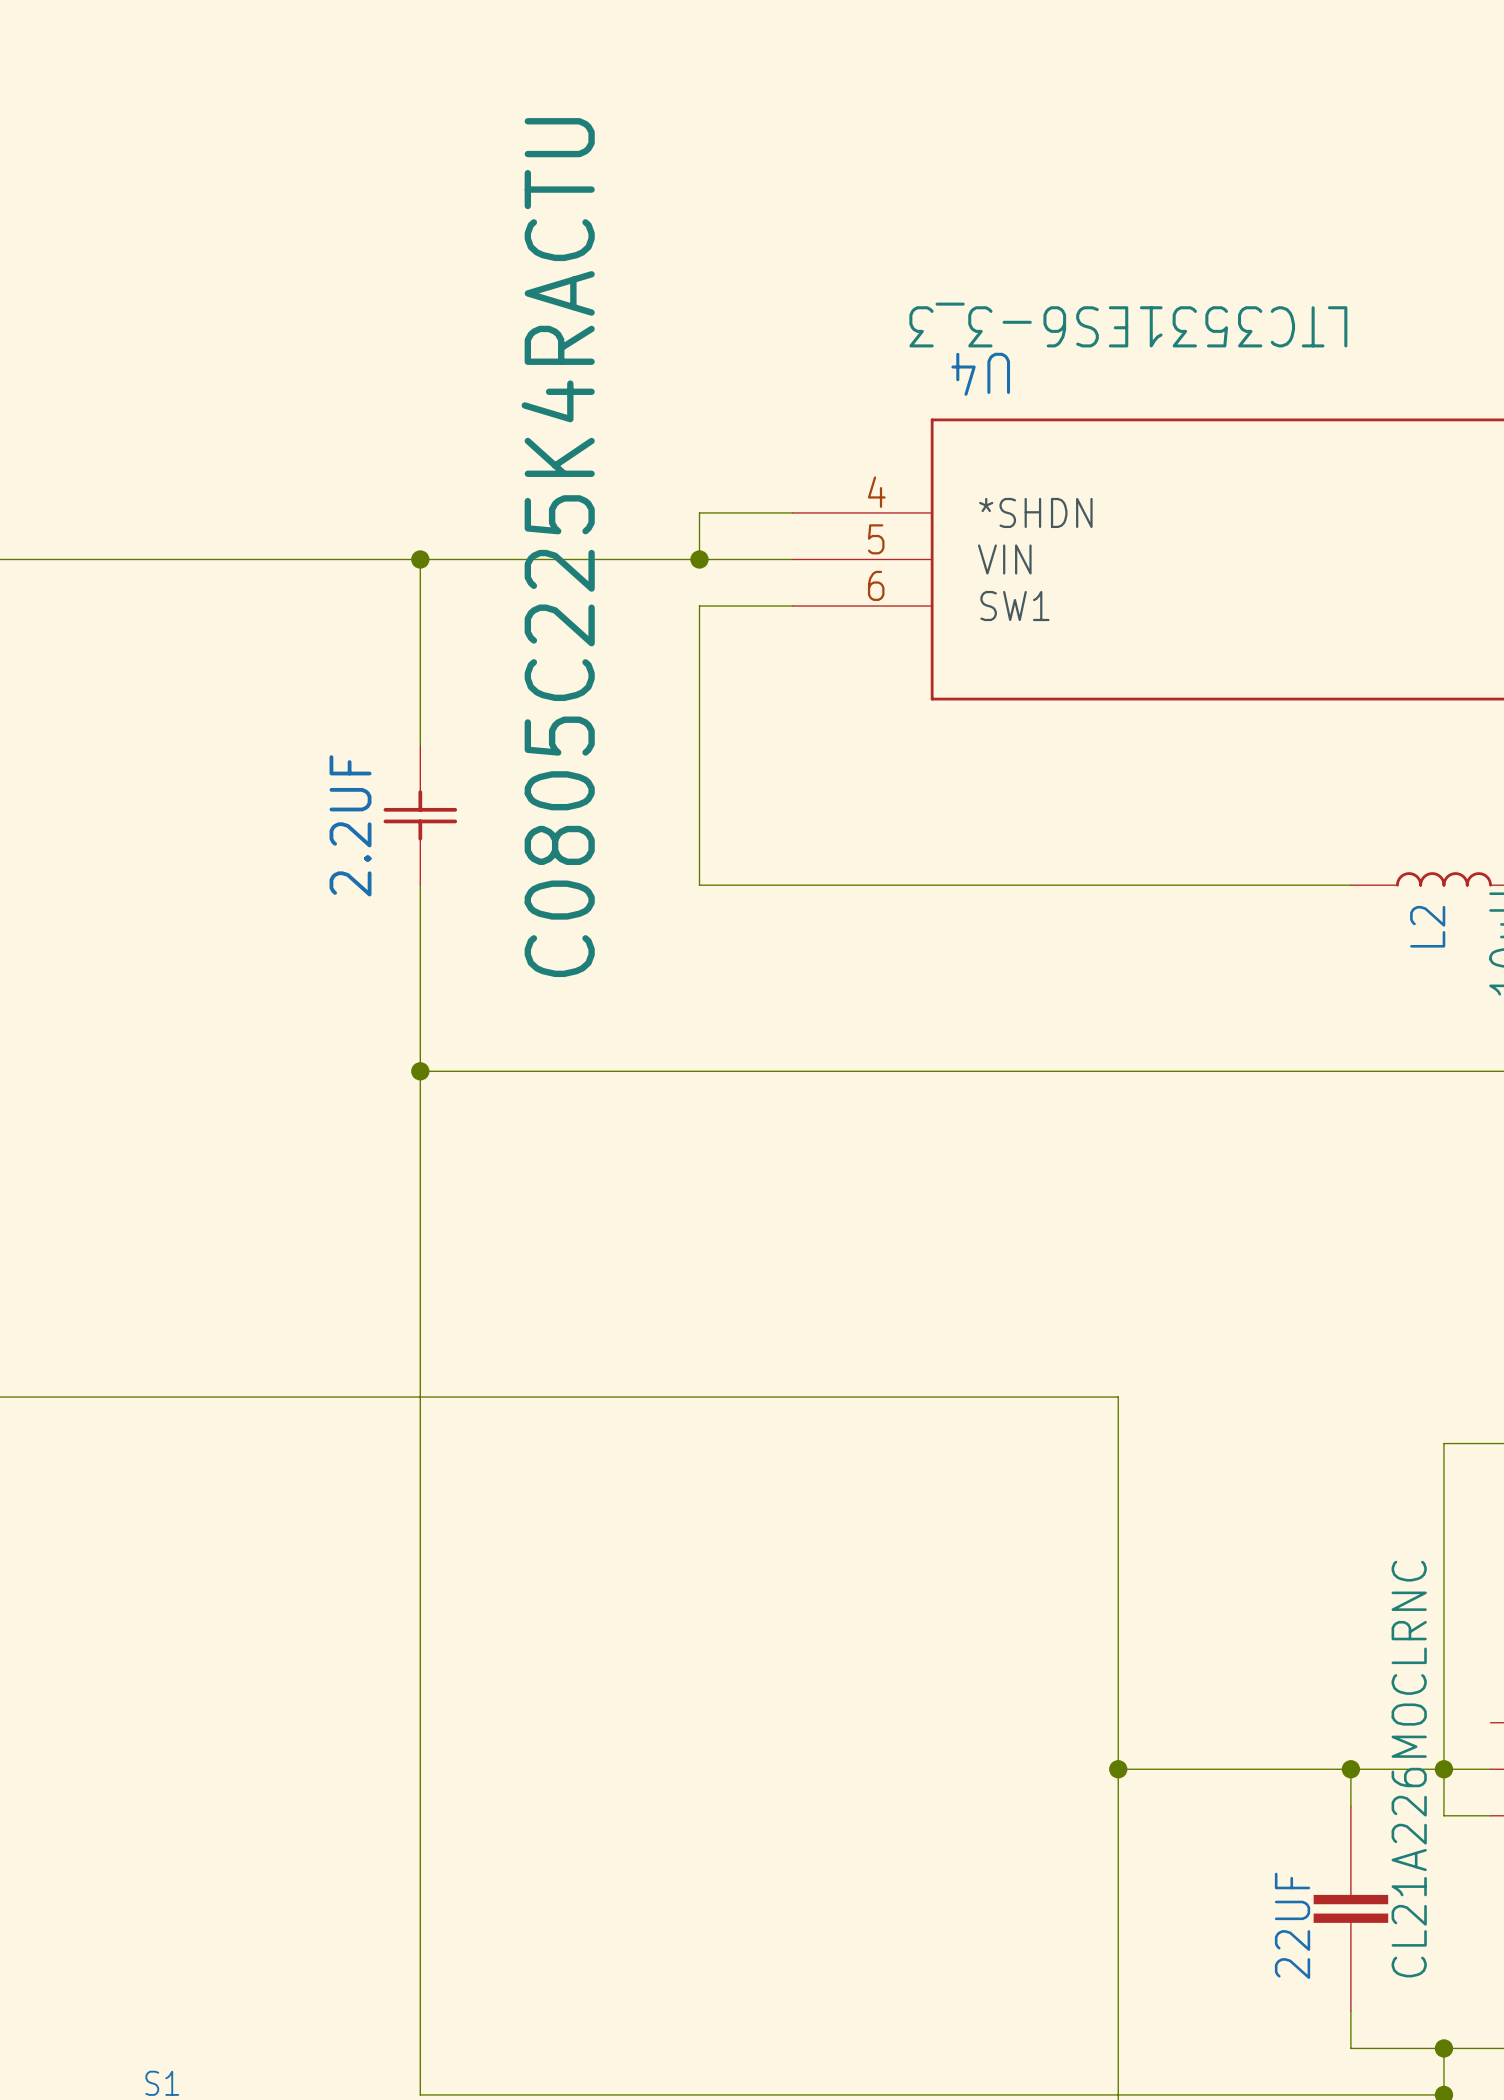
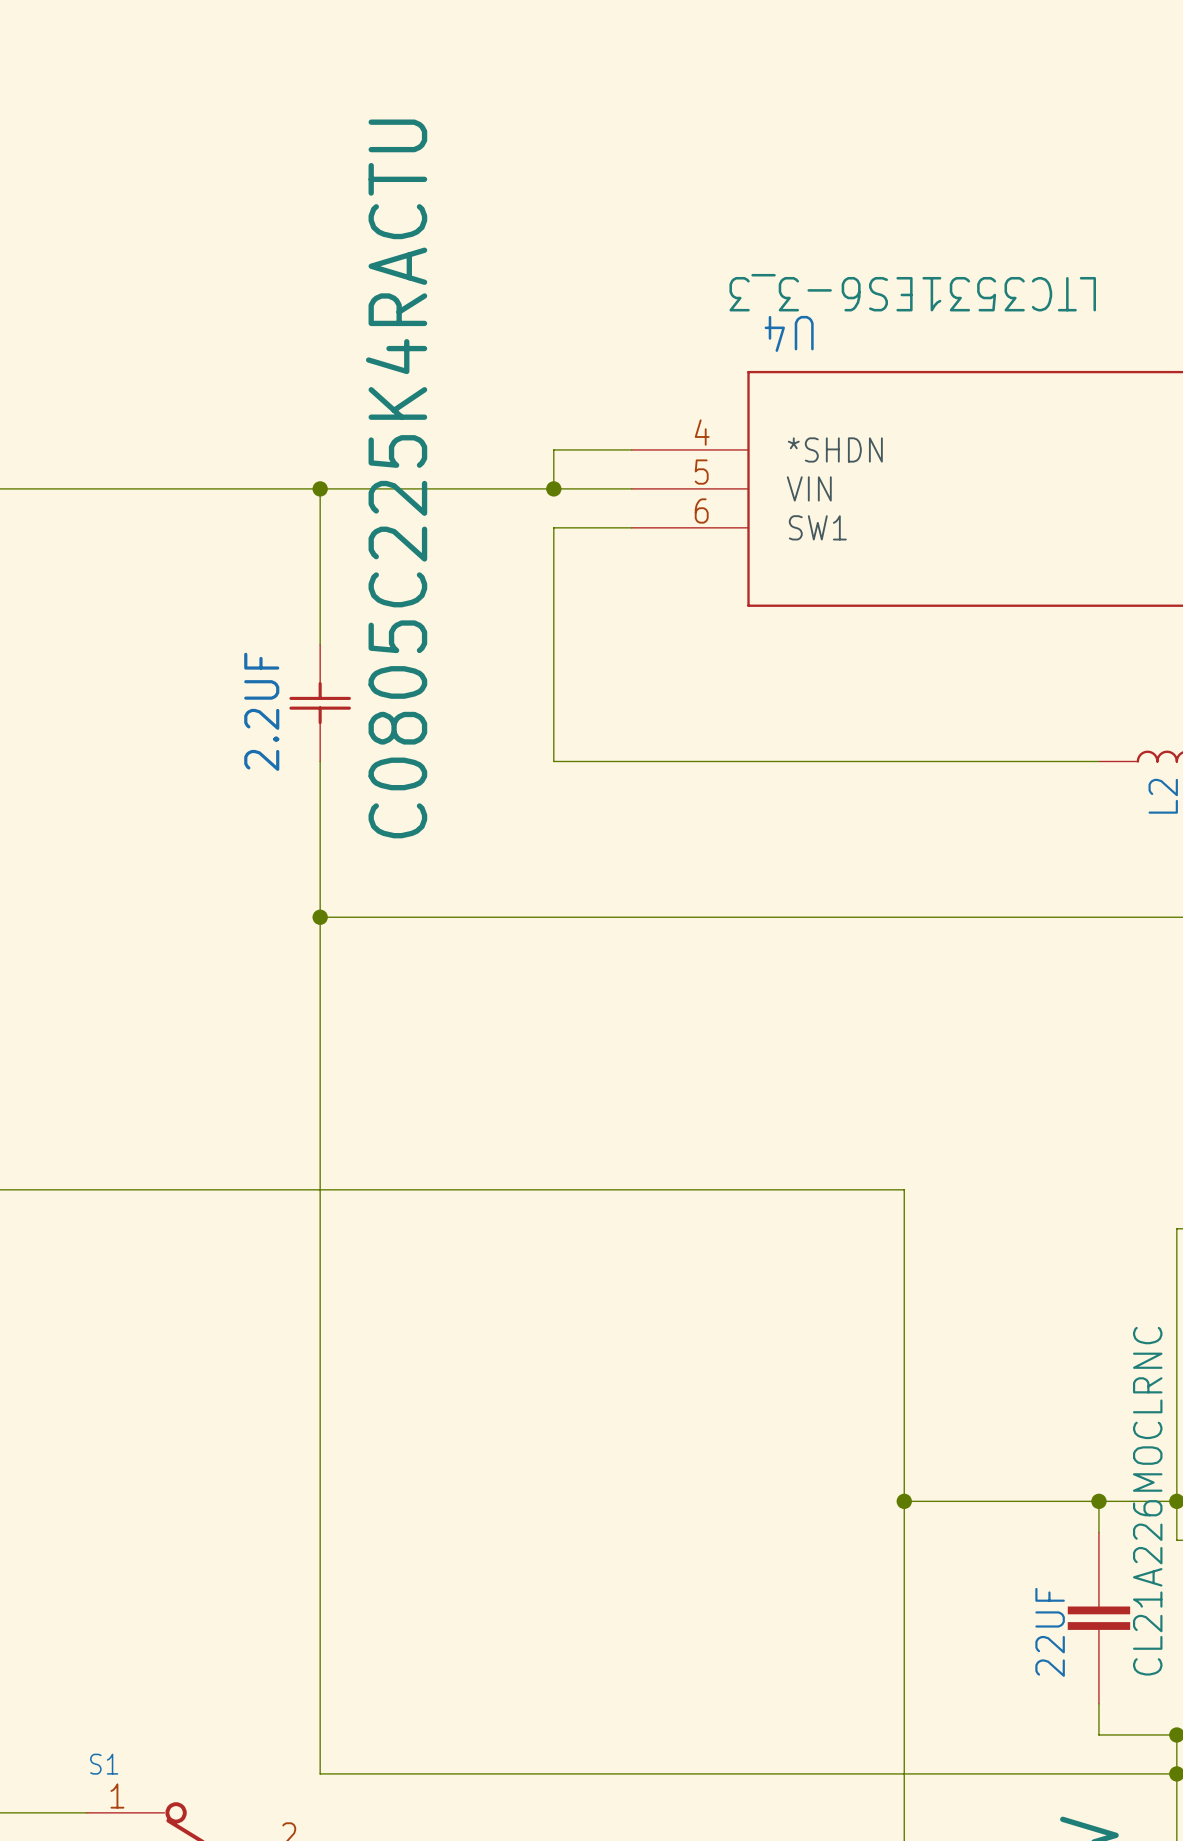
2.2UF value position: C0805C225K4RACTU (558, 547) -> C0805C225K4RACTU (396, 478)

